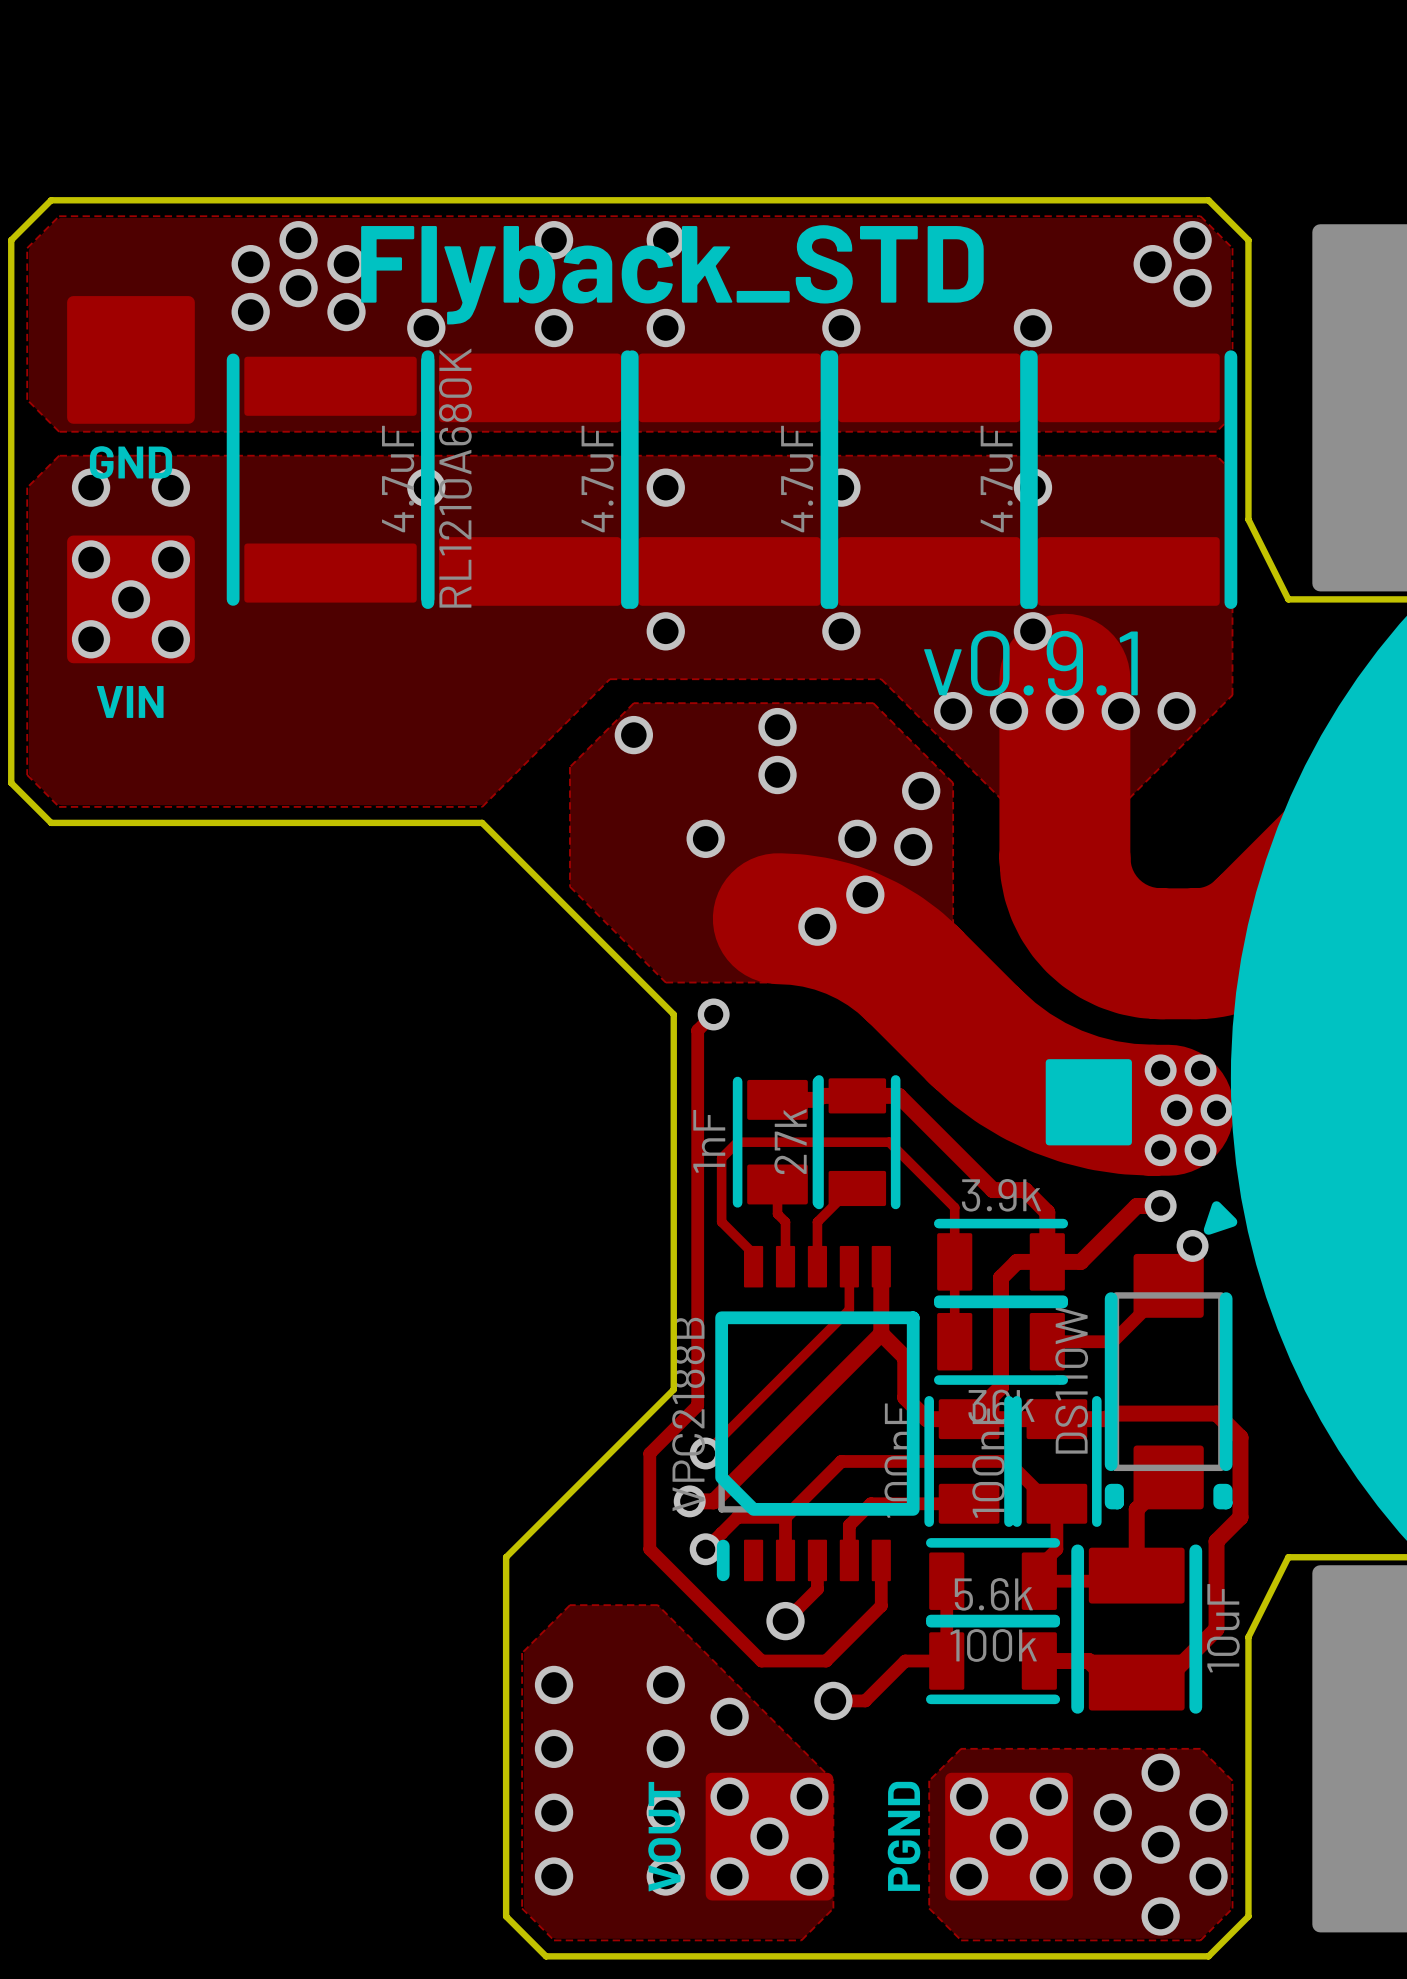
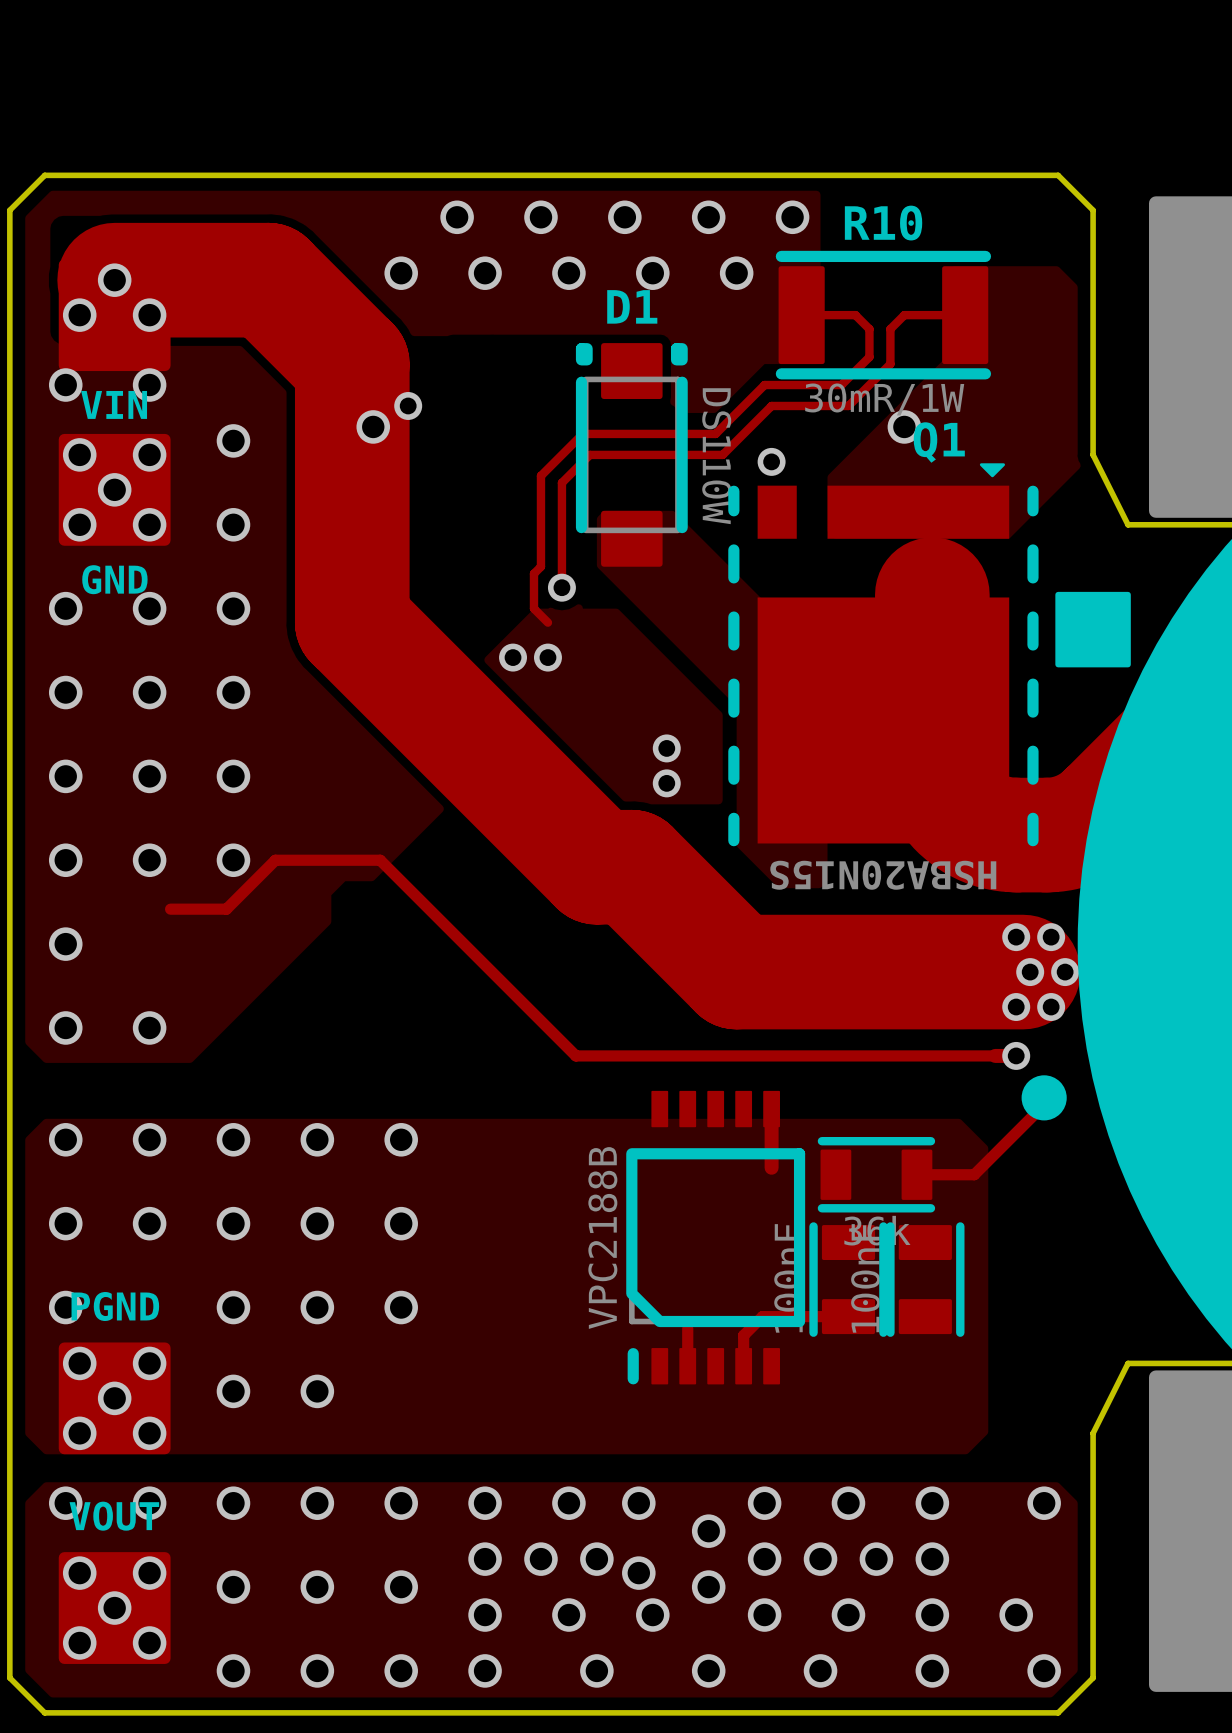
zone outline: (59, 216) (27, 248) (27, 399) (59, 431) (1216, 431) (1232, 415) (1232, 248) (1200, 216) (59, 216) -> none
via: (298, 240) -> none
via position: (554, 240) -> (457, 217)
via: (665, 240) -> none
via: (1192, 240) -> none
via: none -> (540, 217)
via: none -> (624, 217)
via: none -> (708, 217)
via: none -> (792, 217)
via: (250, 264) -> none
via: (346, 264) -> none
via: (1152, 264) -> none
text: Flyback_STD (672, 274) -> none
via: (298, 288) -> none
via: (1192, 288) -> none
via: (250, 312) -> none
via: (346, 312) -> none
via: none -> (652, 273)
via: none -> (114, 280)
via position: (426, 328) -> (401, 273)
via position: (554, 328) -> (485, 273)
via position: (665, 328) -> (568, 273)
via position: (841, 328) -> (736, 273)
via: (1032, 328) -> none
via: none -> (79, 315)
via: none -> (149, 315)
track: none -> (801, 315) (855, 315) (869, 329) (869, 357) (841, 385) (764, 385) (715, 433) (582, 433) (540, 475) (540, 566) (533, 573) (533, 608) (547, 622)
R10: none -> 30mR/1W (883, 315)
track: none -> (965, 315) (904, 315) (890, 329) (890, 364) (848, 405) (771, 405) (722, 454) (589, 454) (561, 482) (561, 587)
via: none -> (65, 385)
via: none -> (149, 385)
track: none -> (382, 385) (387, 385) (408, 405)
zone outline: (59, 455) (1216, 455) (1232, 471) (1232, 695) (1120, 806) (1009, 806) (881, 679) (609, 679) (482, 806) (59, 806) (27, 775) (27, 487) (59, 455) -> none
part value: GND (131, 462) -> VIN (114, 404)
via: none -> (408, 405)
part: RL1210A680K (330, 479) -> none
part: 4.7uF (530, 479) -> none
part: 4.7uF (729, 479) -> none
part: 4.7uF (929, 479) -> none
part: 4.7uF (1128, 479) -> none
via position: (91, 487) -> (79, 454)
via position: (170, 487) -> (149, 454)
via: (665, 487) -> none
via: (841, 487) -> none
via: none -> (233, 440)
D1: none -> DS110W (631, 454)
via: none -> (771, 461)
via: (91, 559) -> none
via: none -> (114, 489)
via: (170, 559) -> none
via: none -> (79, 524)
part position: (130, 599) -> (114, 489)
via: (130, 599) -> none
via: none -> (149, 524)
via: none -> (233, 524)
via: (665, 631) -> none
via: (841, 631) -> none
via: (1032, 631) -> none
via: (91, 639) -> none
via: (170, 639) -> none
text: v0.9.1 (1030, 663) -> none
via: none -> (561, 587)
via: none -> (65, 608)
via: none -> (149, 608)
via: none -> (233, 608)
part value: VIN (130, 701) -> GND (114, 579)
zone outline: (633, 703) (569, 767) (569, 886) (665, 982) (953, 982) (981, 954) (953, 926) (953, 782) (873, 703) (633, 703) -> none
via: (953, 711) -> none
via: (1009, 711) -> none
via: (1064, 711) -> none
via: (1120, 711) -> none
via: (1176, 711) -> none
via: (777, 727) -> none
via position: (633, 735) -> (547, 657)
Q1: none -> HSBA20N15S (883, 654)
via: none -> (513, 657)
via: (777, 775) -> none
board edge: (11, 782) (51, 822) (482, 822) (673, 1014) (673, 1389) (506, 1557) (506, 1916) (546, 1956) -> (9, 685) (9, 1677) (44, 1712) (478, 1712)
via: none -> (65, 692)
via: none -> (149, 692)
via: none -> (233, 692)
via: (921, 790) -> none
via: (705, 838) -> none
via: (857, 838) -> none
via: (913, 846) -> none
via: none -> (666, 748)
via: none -> (65, 776)
via: none -> (149, 776)
via: none -> (233, 776)
via: none -> (666, 783)
via: (865, 894) -> none
track: (778, 918) (797, 919) (833, 926) (851, 933) (884, 950) (913, 974) (993, 1053) (1034, 1080) (1079, 1099) (1103, 1105) (1152, 1110) -> (114, 280) (268, 280) (352, 364) (352, 622) (596, 867) (631, 867) (736, 972) (1009, 972)
via: (817, 926) -> none
via: none -> (65, 860)
via: none -> (149, 860)
via: none -> (233, 860)
track: (713, 1014) (697, 1030) (697, 1405) (649, 1453) (649, 1549) (761, 1661) (826, 1661) (881, 1605) (881, 1560) -> none
via: (713, 1014) -> none
via: none -> (65, 944)
track: (777, 1099) (817, 1099) (821, 1095) (898, 1095) (993, 1190) (1024, 1190) (1047, 1212) (1047, 1261) -> none
drawing position: (1088, 1102) -> (1093, 629)
part: 1nF (777, 1142) -> none
part: 27k (857, 1142) -> none
via: none -> (65, 1027)
via: none -> (149, 1027)
track: (777, 1184) (777, 1214) (785, 1222) (785, 1266) -> none
track: (857, 1188) (850, 1188) (817, 1222) (817, 1266) -> none
drawing shape: [1203, 1201, 1238, 1235] -> [1021, 1075, 1067, 1121]
track: (1136, 1206) (1080, 1261) (1016, 1261) (1001, 1277) (1001, 1387) (969, 1419) -> (995, 1055) (575, 1055) (380, 860) (275, 860) (226, 909) (170, 909)
part: 3.9k (1001, 1261) -> none
track: (753, 1266) (753, 1253) (721, 1222) (721, 1158) (737, 1142) (889, 1142) (954, 1207) (954, 1341) -> none
track: (849, 1266) (849, 1309) (705, 1453) -> none
via: none -> (65, 1139)
via: none -> (149, 1139)
via: none -> (233, 1139)
via: none -> (317, 1139)
via: none -> (401, 1139)
part: DS110W (1168, 1381) -> none
via: none -> (65, 1223)
via: none -> (149, 1223)
via: none -> (233, 1223)
via: none -> (317, 1223)
via: none -> (401, 1223)
via: (705, 1453) -> none
track: (1168, 1477) (1136, 1509) (1136, 1575) (1131, 1581) (1039, 1581) (1039, 1566) (1056, 1549) (1056, 1503) (1050, 1503) (1007, 1461) (841, 1461) (785, 1517) (737, 1517) (705, 1549) -> none
via: none -> (65, 1307)
via: none -> (233, 1307)
via: none -> (317, 1307)
via: none -> (401, 1307)
track: (689, 1501) (713, 1501) (881, 1333) (905, 1357) (905, 1397) (926, 1419) (1107, 1419) (1112, 1413) (1216, 1413) (1240, 1437) (1240, 1517) (1216, 1541) (1216, 1629) (1163, 1682) (1110, 1682) (1088, 1661) (1039, 1661) -> none
via: (689, 1501) -> none
via: (705, 1549) -> none
via: none -> (79, 1363)
via: none -> (149, 1363)
track: (817, 1560) (817, 1589) (785, 1621) -> none
track: (946, 1581) (946, 1661) (905, 1661) (865, 1700) (833, 1700) -> none
part: 100k (993, 1581) -> none
via: none -> (233, 1391)
via: none -> (317, 1391)
via: none -> (114, 1398)
zone outline: (569, 1605) (657, 1605) (833, 1780) (833, 1908) (801, 1940) (554, 1940) (522, 1908) (522, 1653) (569, 1605) -> none
via: (785, 1621) -> none
part: 10uF (1136, 1629) -> none
via: none -> (79, 1433)
via: none -> (149, 1433)
part: 5.6k (993, 1661) -> none
via: (554, 1684) -> none
via: (665, 1684) -> none
via: (833, 1700) -> none
via: none -> (65, 1503)
via: none -> (149, 1503)
via: none -> (233, 1503)
via: none -> (317, 1503)
via: none -> (401, 1503)
via: none -> (485, 1503)
via: none -> (568, 1503)
via: none -> (764, 1503)
via: none -> (848, 1503)
via: none -> (932, 1503)
via: none -> (1044, 1503)
via: (554, 1748) -> none
via: (665, 1748) -> none
via: none -> (708, 1531)
zone outline: (961, 1748) (1200, 1748) (1232, 1780) (1232, 1908) (1200, 1940) (961, 1940) (929, 1908) (929, 1780) (961, 1748) -> none
via: (1160, 1772) -> none
via: none -> (485, 1559)
via: none -> (540, 1559)
via: none -> (596, 1559)
via: none -> (764, 1559)
via: none -> (820, 1559)
via: none -> (876, 1559)
via: none -> (79, 1573)
via: none -> (149, 1573)
via position: (809, 1796) -> (708, 1587)
via: (969, 1796) -> none
via position: (1048, 1796) -> (932, 1559)
via: none -> (233, 1587)
via: none -> (317, 1587)
via: none -> (401, 1587)
via: (554, 1812) -> none
via: (665, 1812) -> none
via: (1112, 1812) -> none
via: (1208, 1812) -> none
via: none -> (114, 1608)
part value rotation: 0° (664, 1836) -> 90° clockwise (114, 1516)
part position: (769, 1836) -> (114, 1608)
via: (769, 1836) -> none
part value rotation: 0° (904, 1836) -> 90° clockwise (115, 1306)
part position: (1009, 1836) -> (114, 1398)
via: (1009, 1836) -> none
via: none -> (485, 1615)
via: none -> (568, 1615)
via: none -> (652, 1615)
via: none -> (764, 1615)
via: none -> (848, 1615)
via: none -> (932, 1615)
via: none -> (79, 1642)
via: none -> (149, 1642)
via: (554, 1876) -> none
via: (665, 1876) -> none
via: (729, 1876) -> none
via position: (809, 1876) -> (708, 1670)
via: (969, 1876) -> none
via: (1048, 1876) -> none
via: (1112, 1876) -> none
via: (1208, 1876) -> none
via: none -> (233, 1670)
via: none -> (317, 1670)
via: none -> (401, 1670)
via: none -> (485, 1670)
via: none -> (596, 1670)
via: none -> (820, 1670)
via: none -> (932, 1670)
via: none -> (1044, 1670)
via: (1160, 1916) -> none

